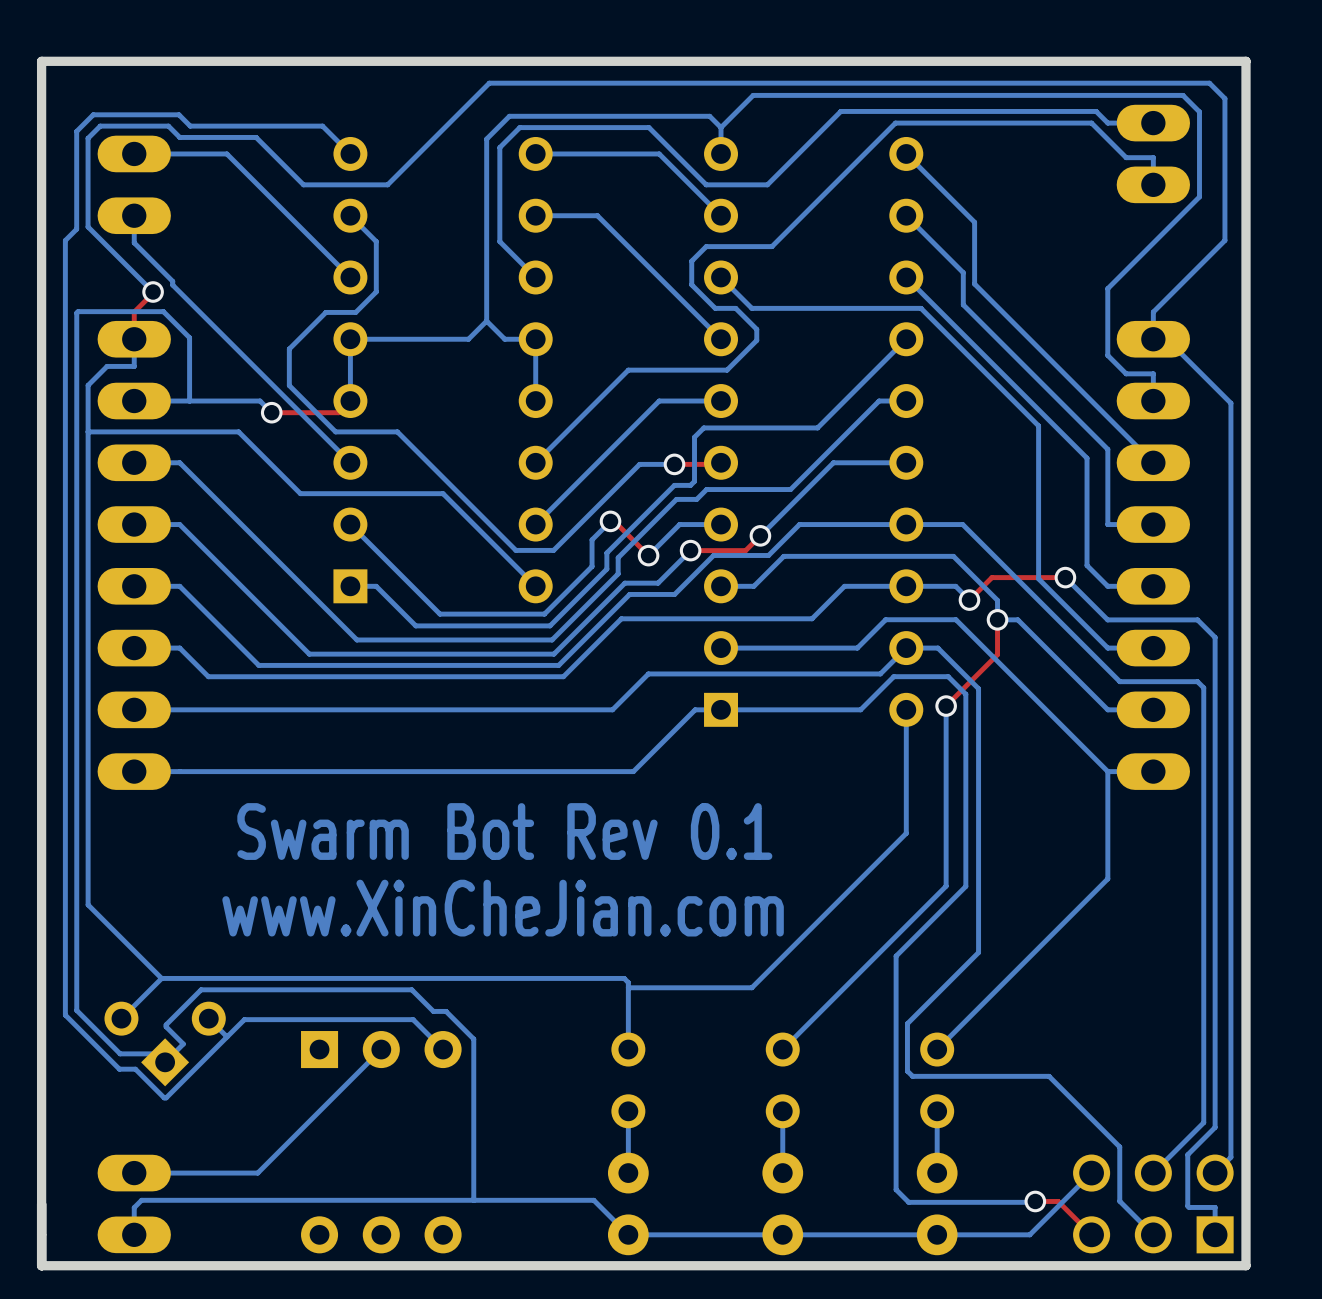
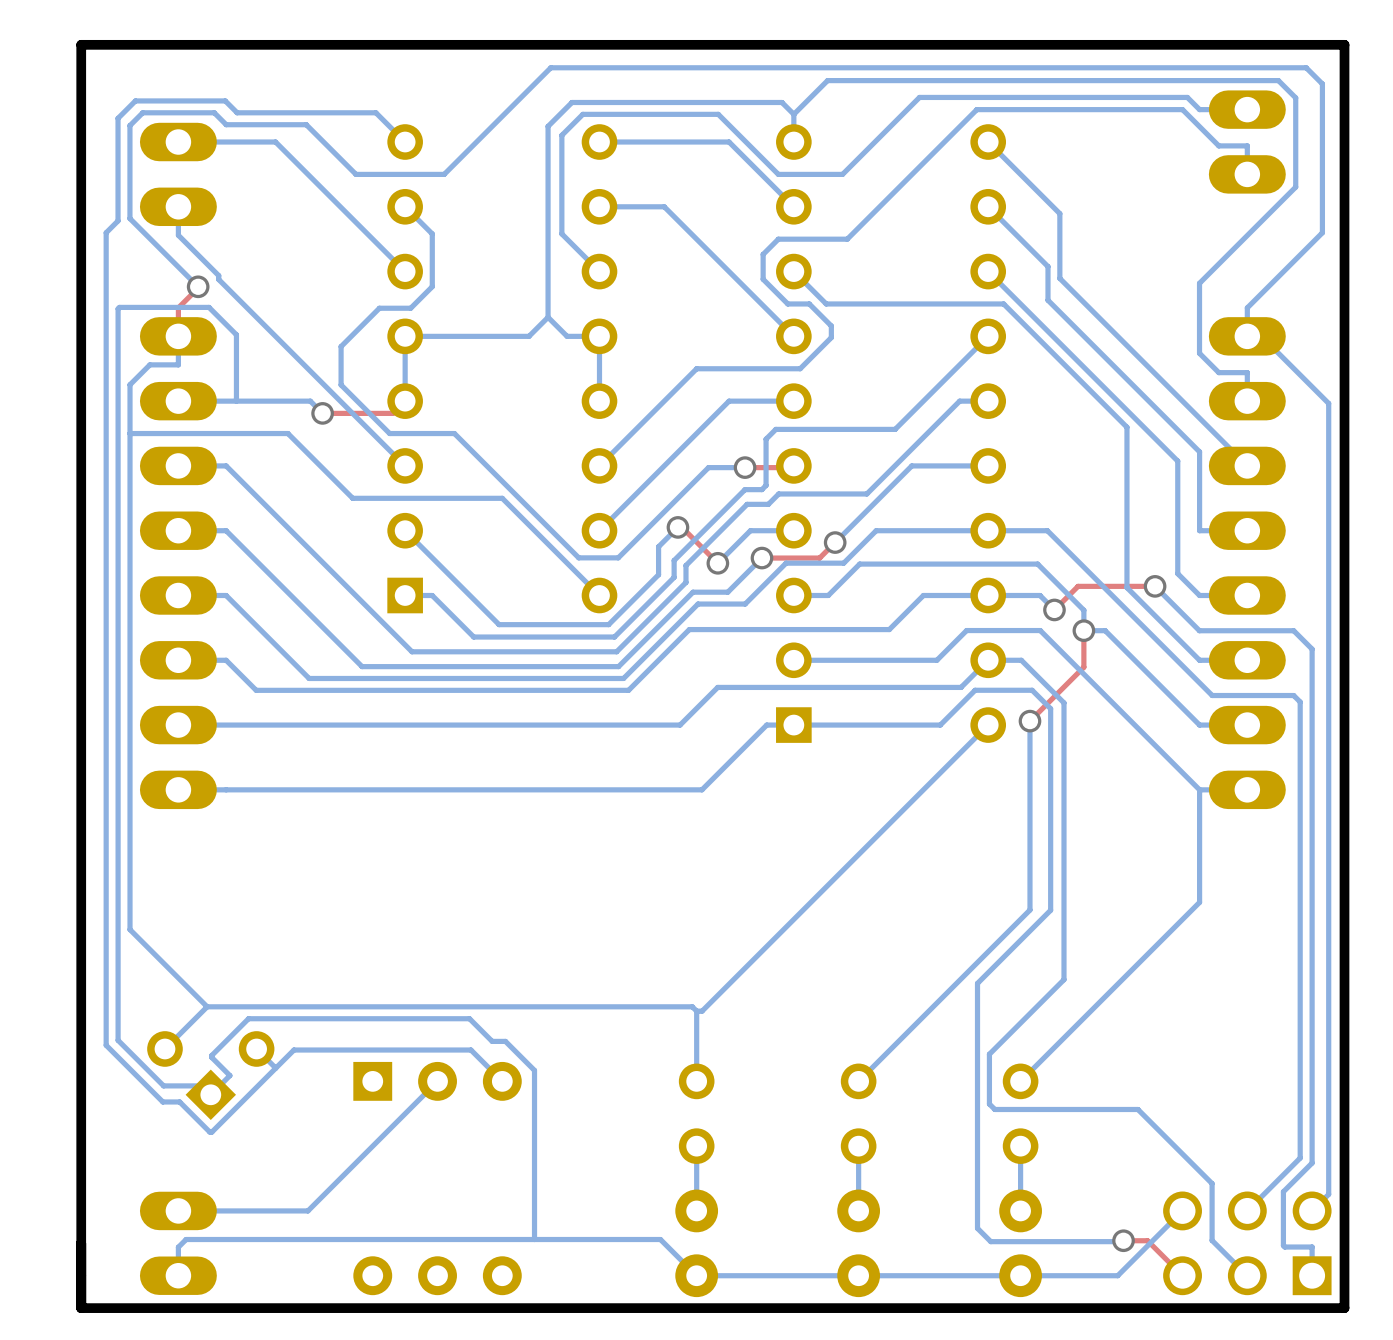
bottom track: (906, 709) (906, 833) (751, 987) (628, 987) -> (988, 725) (702, 1011) (696, 1011)
text: Swarm Bot Rev 0.1 (504, 831) -> none
text: www.XinCheJian.com (503, 908) -> none

